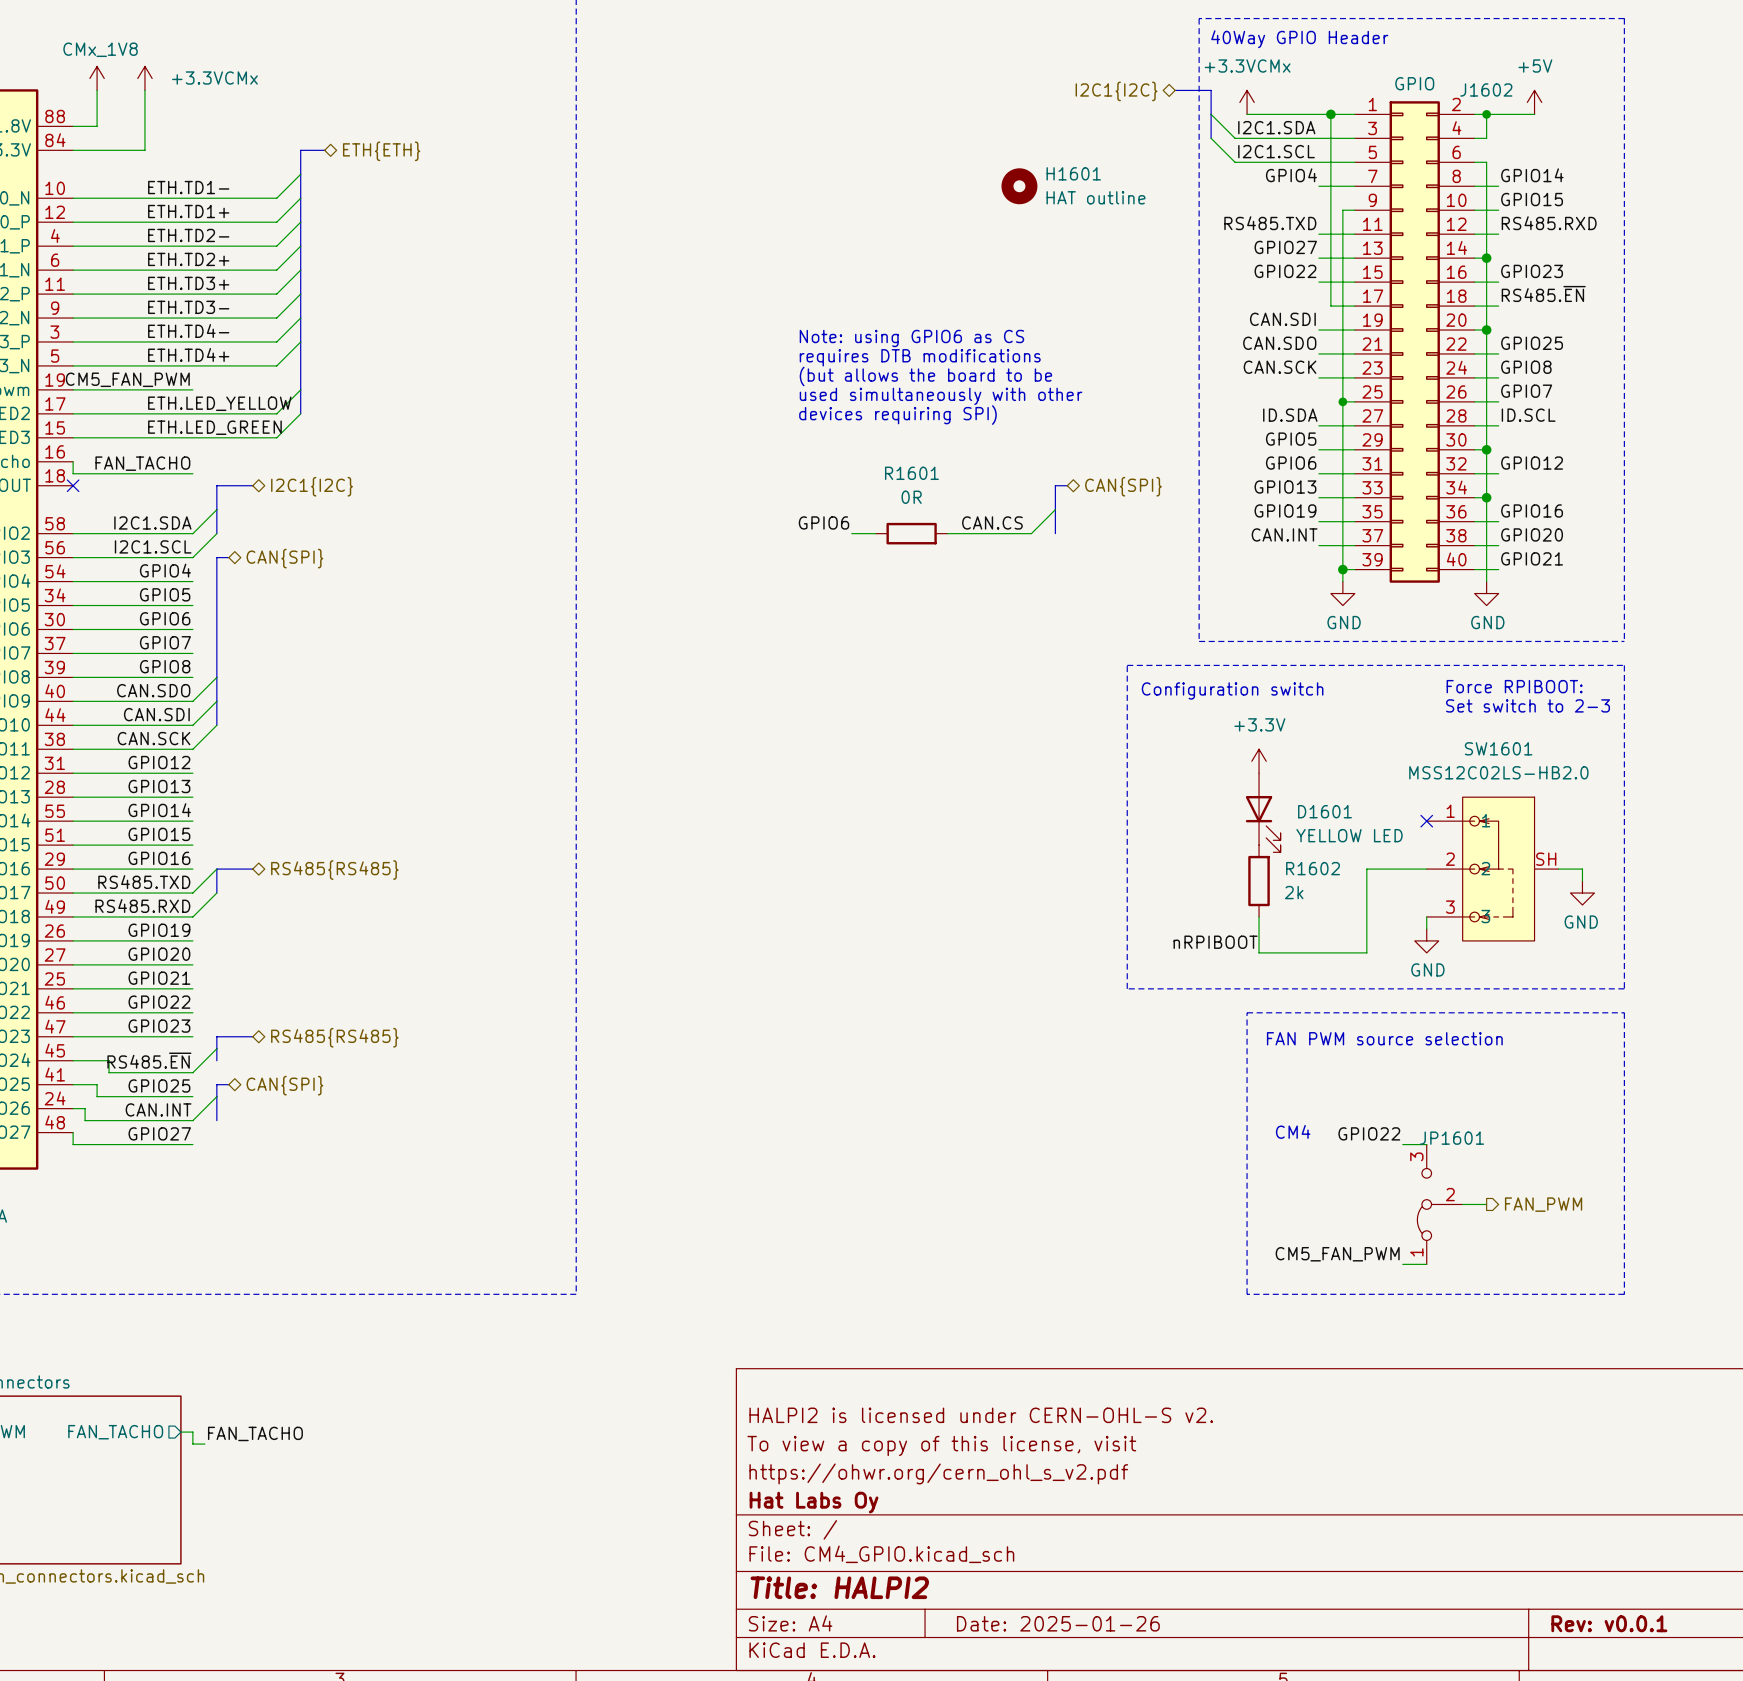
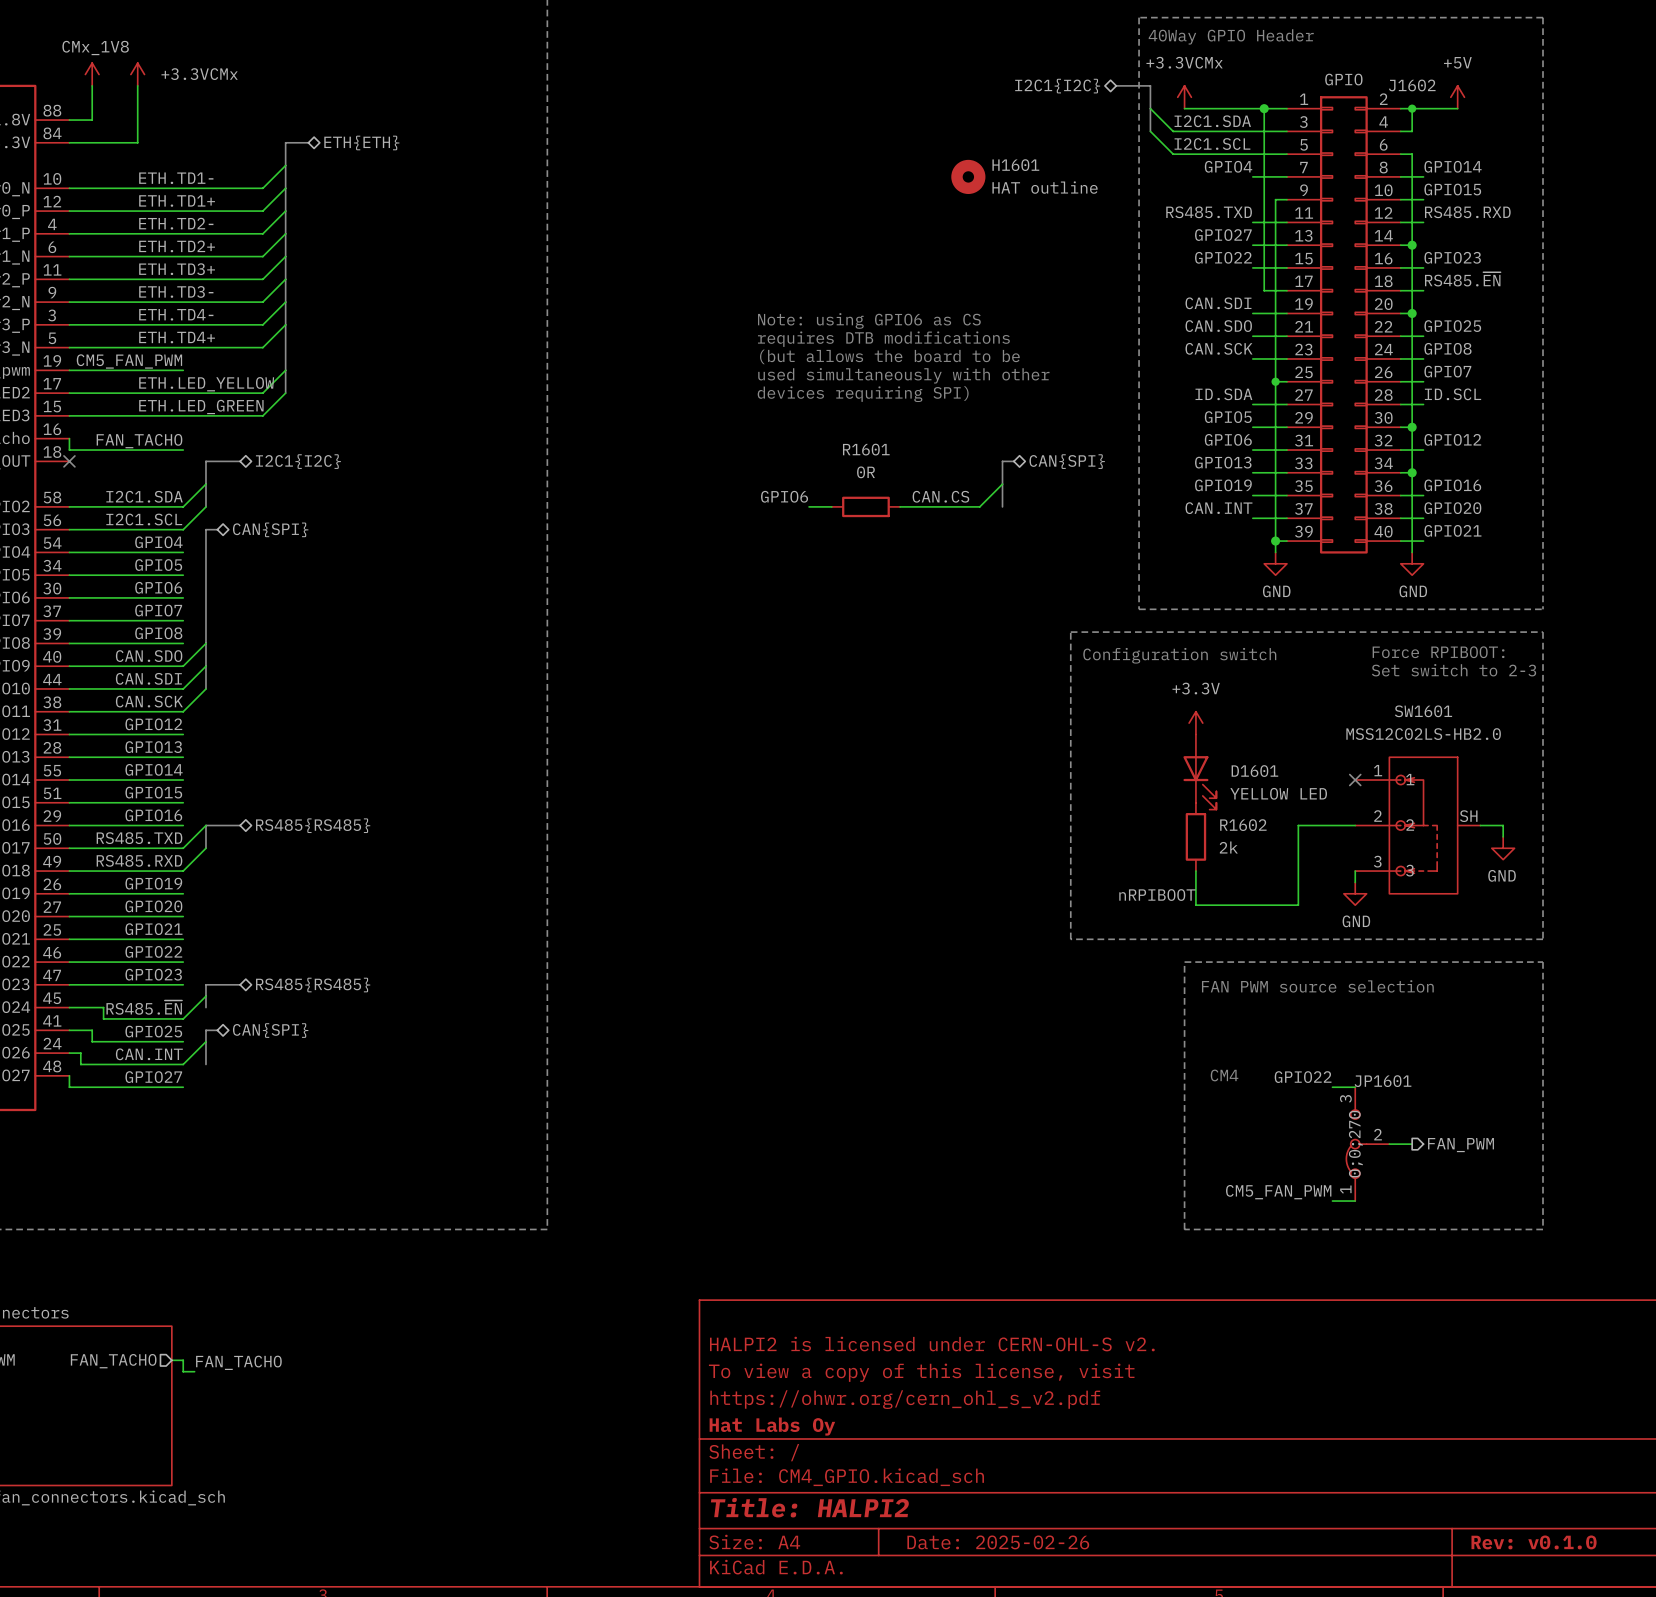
JP1601 text: none -> 0;0;270 (1355, 1144)
title block: Date: 2025-01-26 (1058, 1623) -> Date: 2025-02-26 (998, 1542)
title block: Rev: v0.0.1 (1609, 1623) -> Rev: v0.1.0 (1534, 1542)

